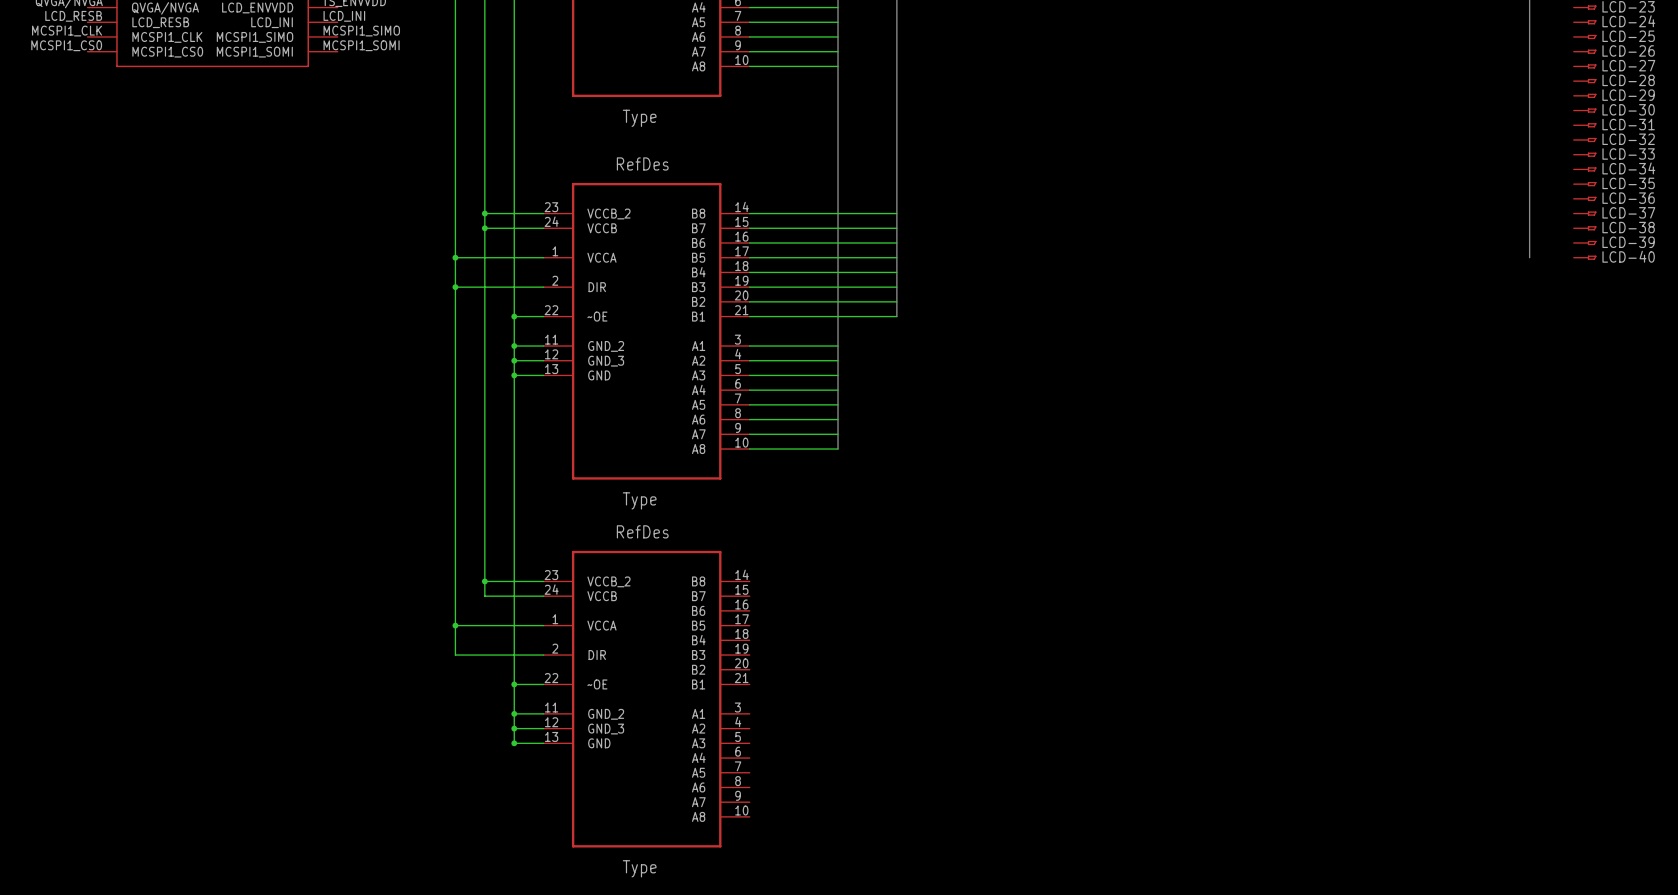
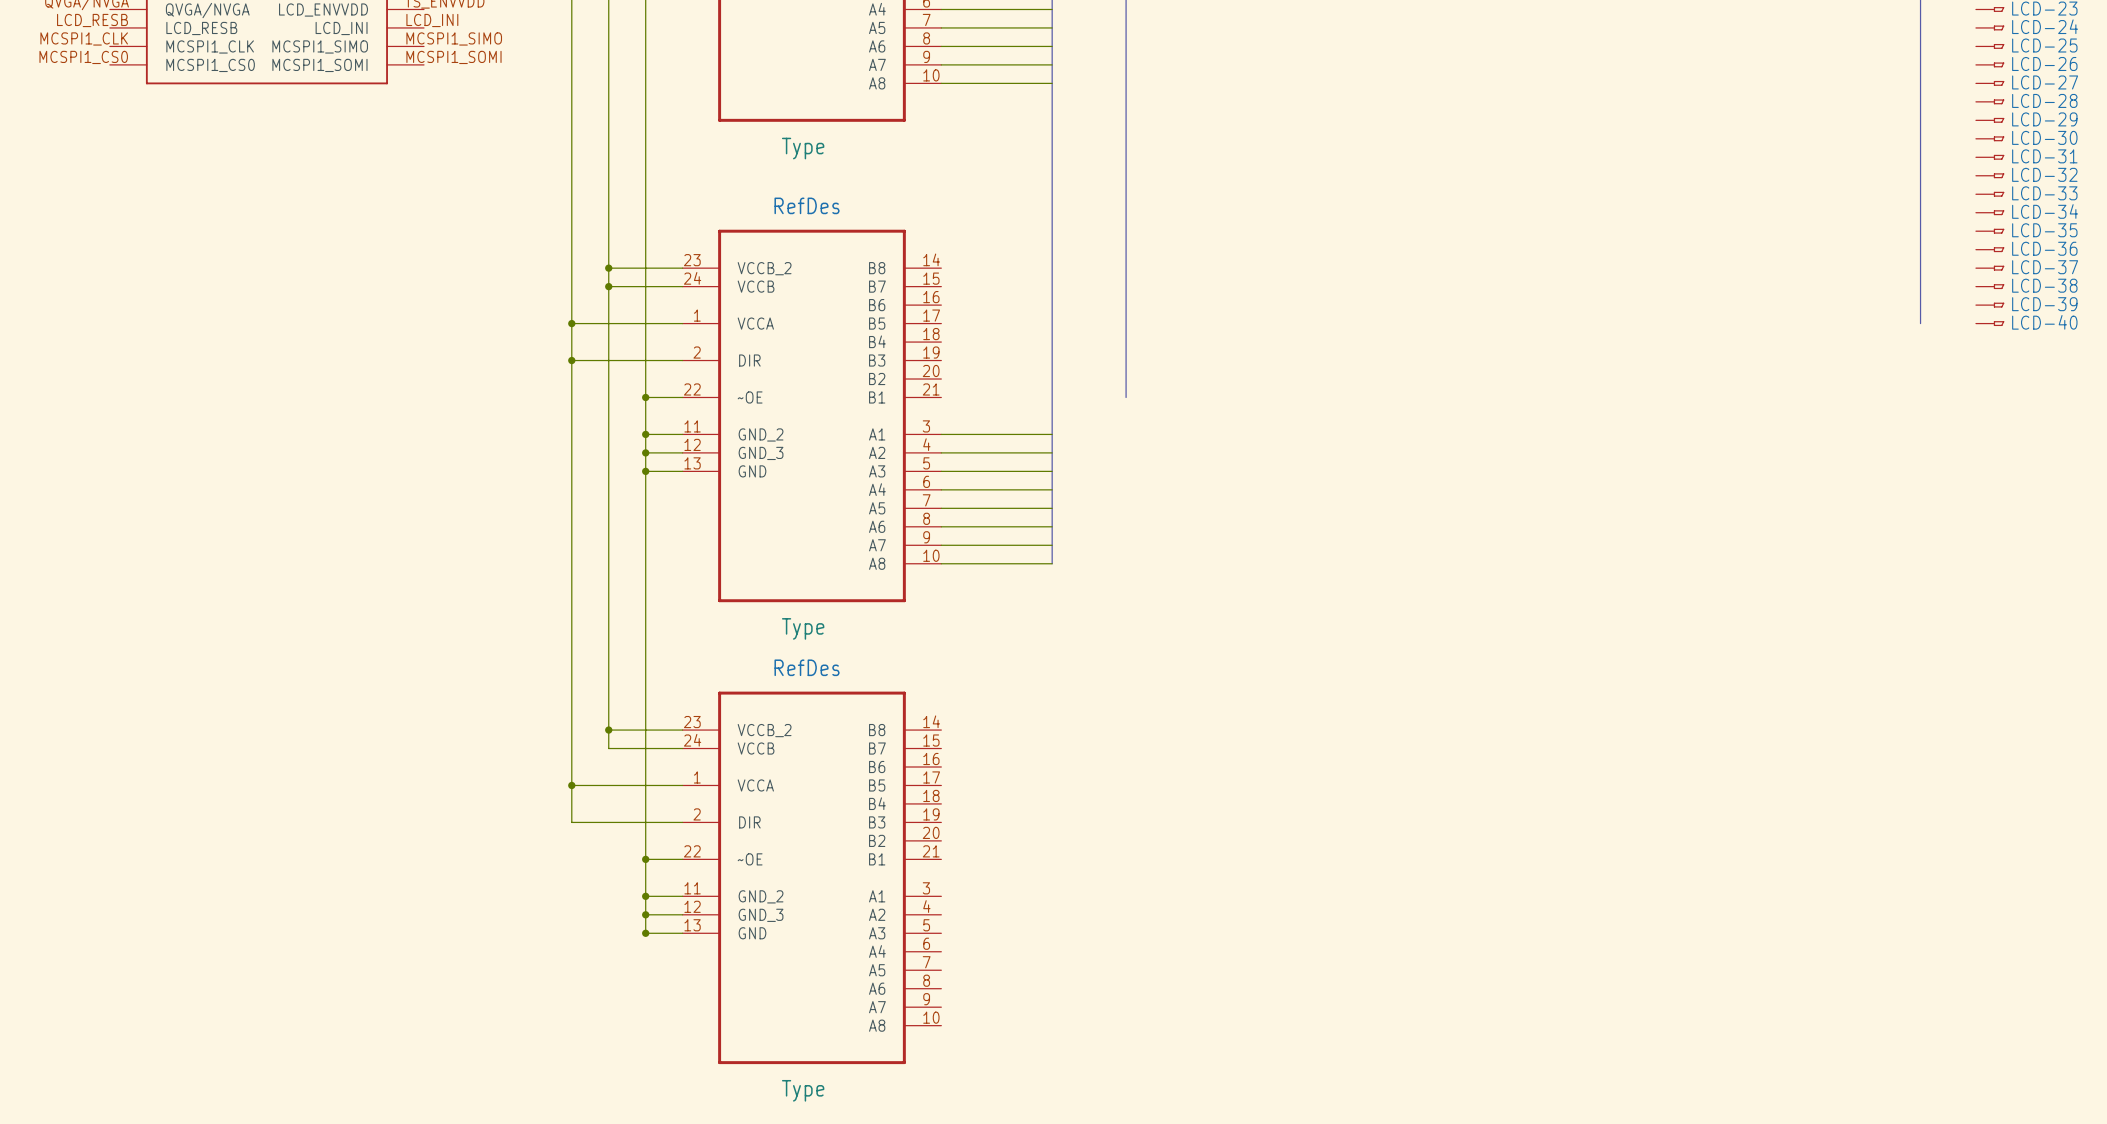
wire: (749, 213) (896, 213) -> none
wire: (749, 228) (896, 228) -> none
wire: (749, 243) (896, 243) -> none
wire: (749, 257) (896, 257) -> none
wire: (749, 272) (896, 272) -> none
wire: (749, 287) (896, 287) -> none
wire: (749, 301) (896, 301) -> none
wire: (749, 316) (896, 316) -> none

